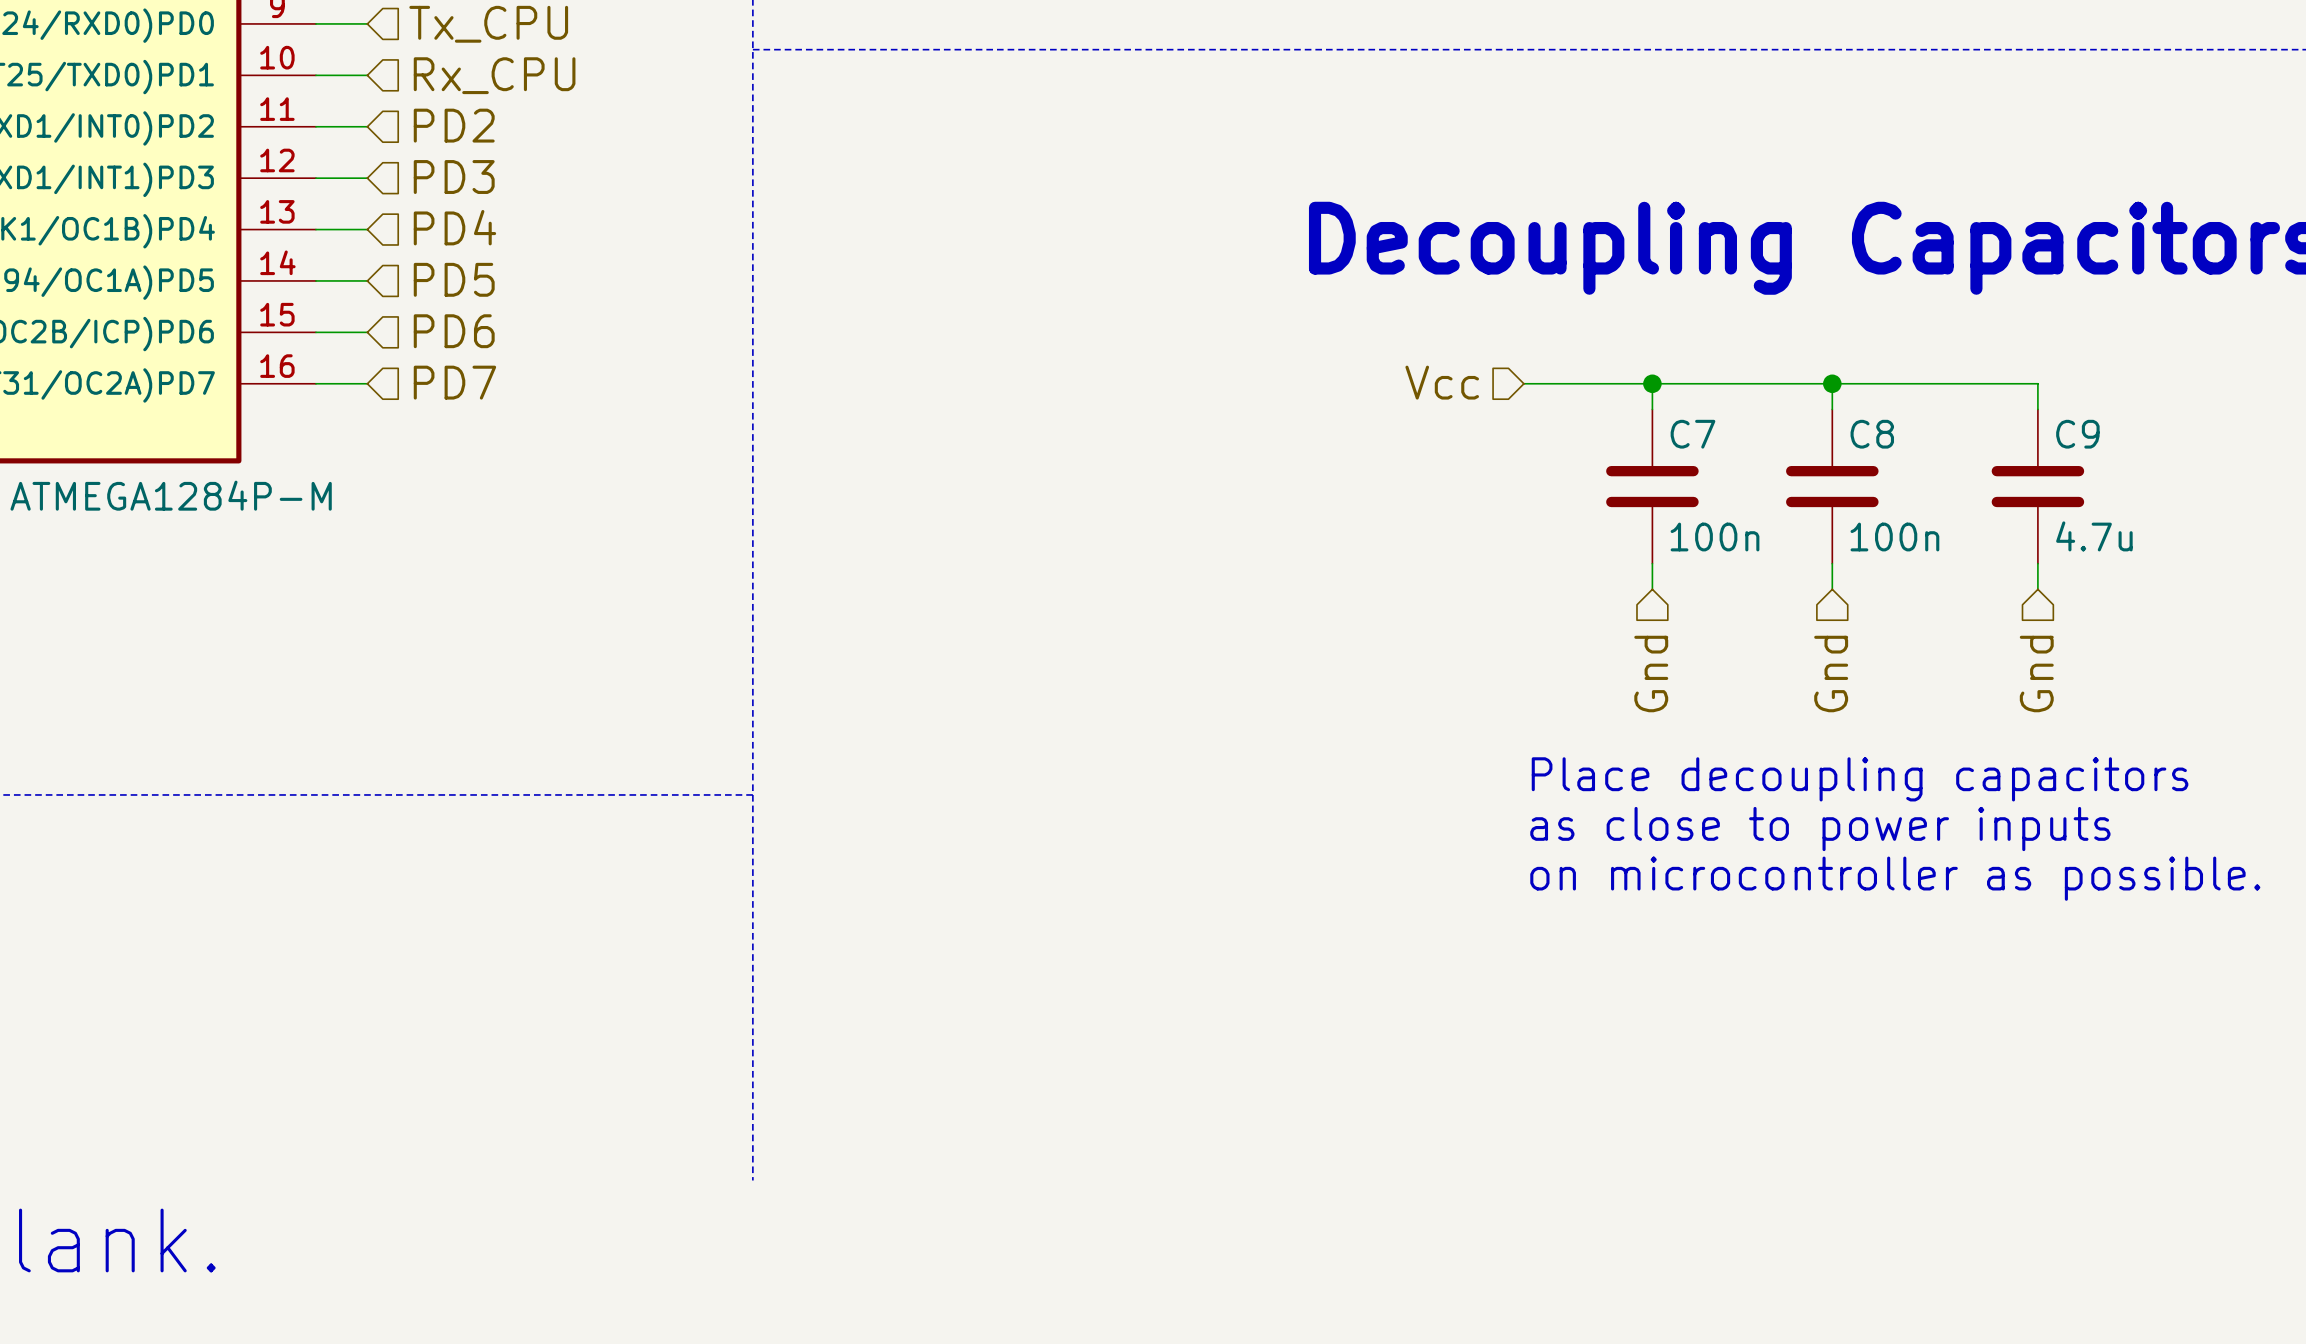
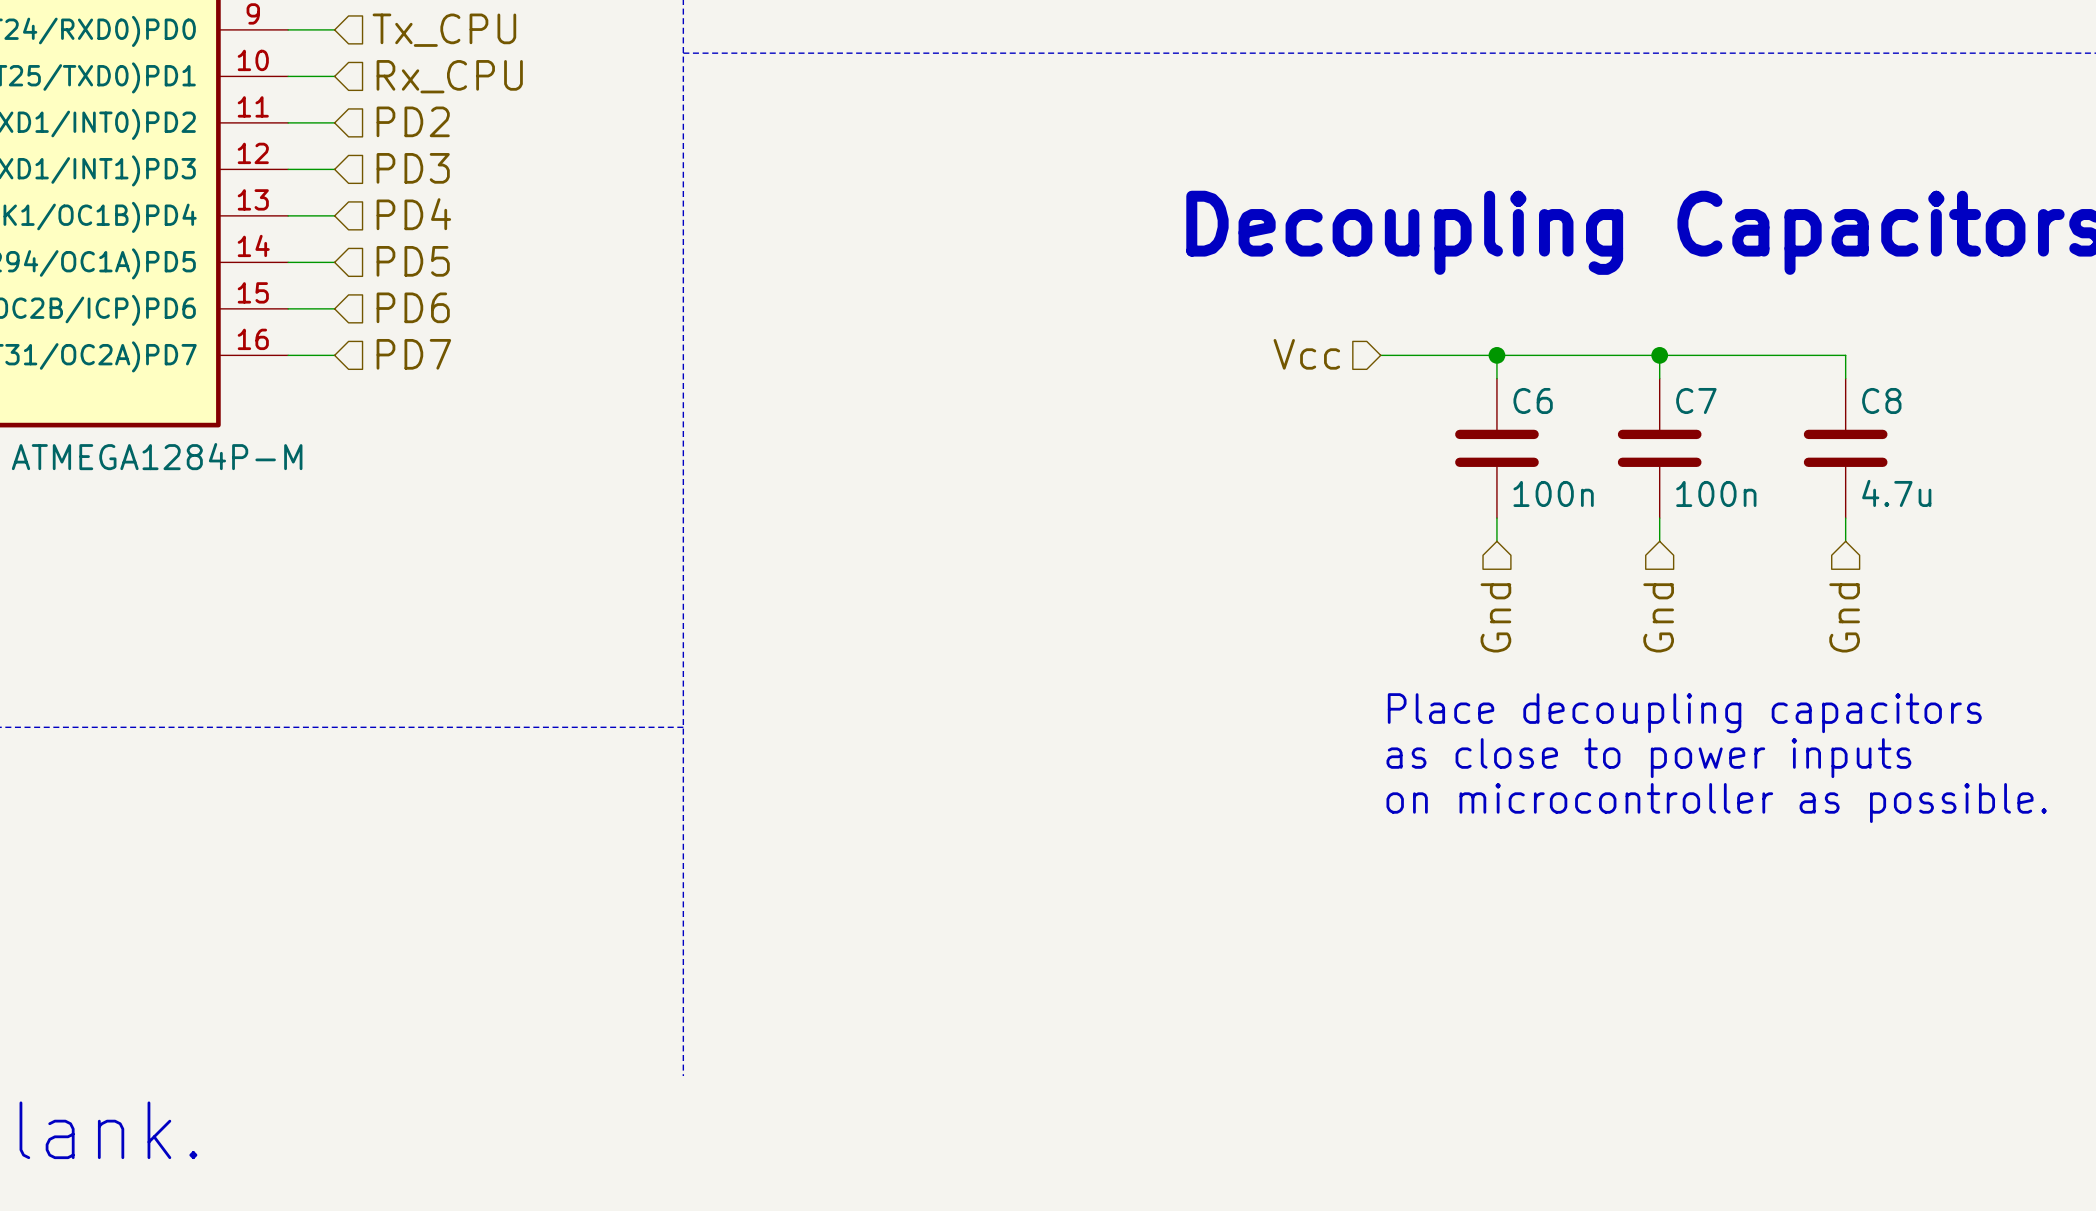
C7 name: C7 (1692, 434) -> C6 (1533, 400)
C8 name: C8 (1872, 434) -> C7 (1696, 400)
C9 name: C9 (2077, 434) -> C8 (1881, 400)

